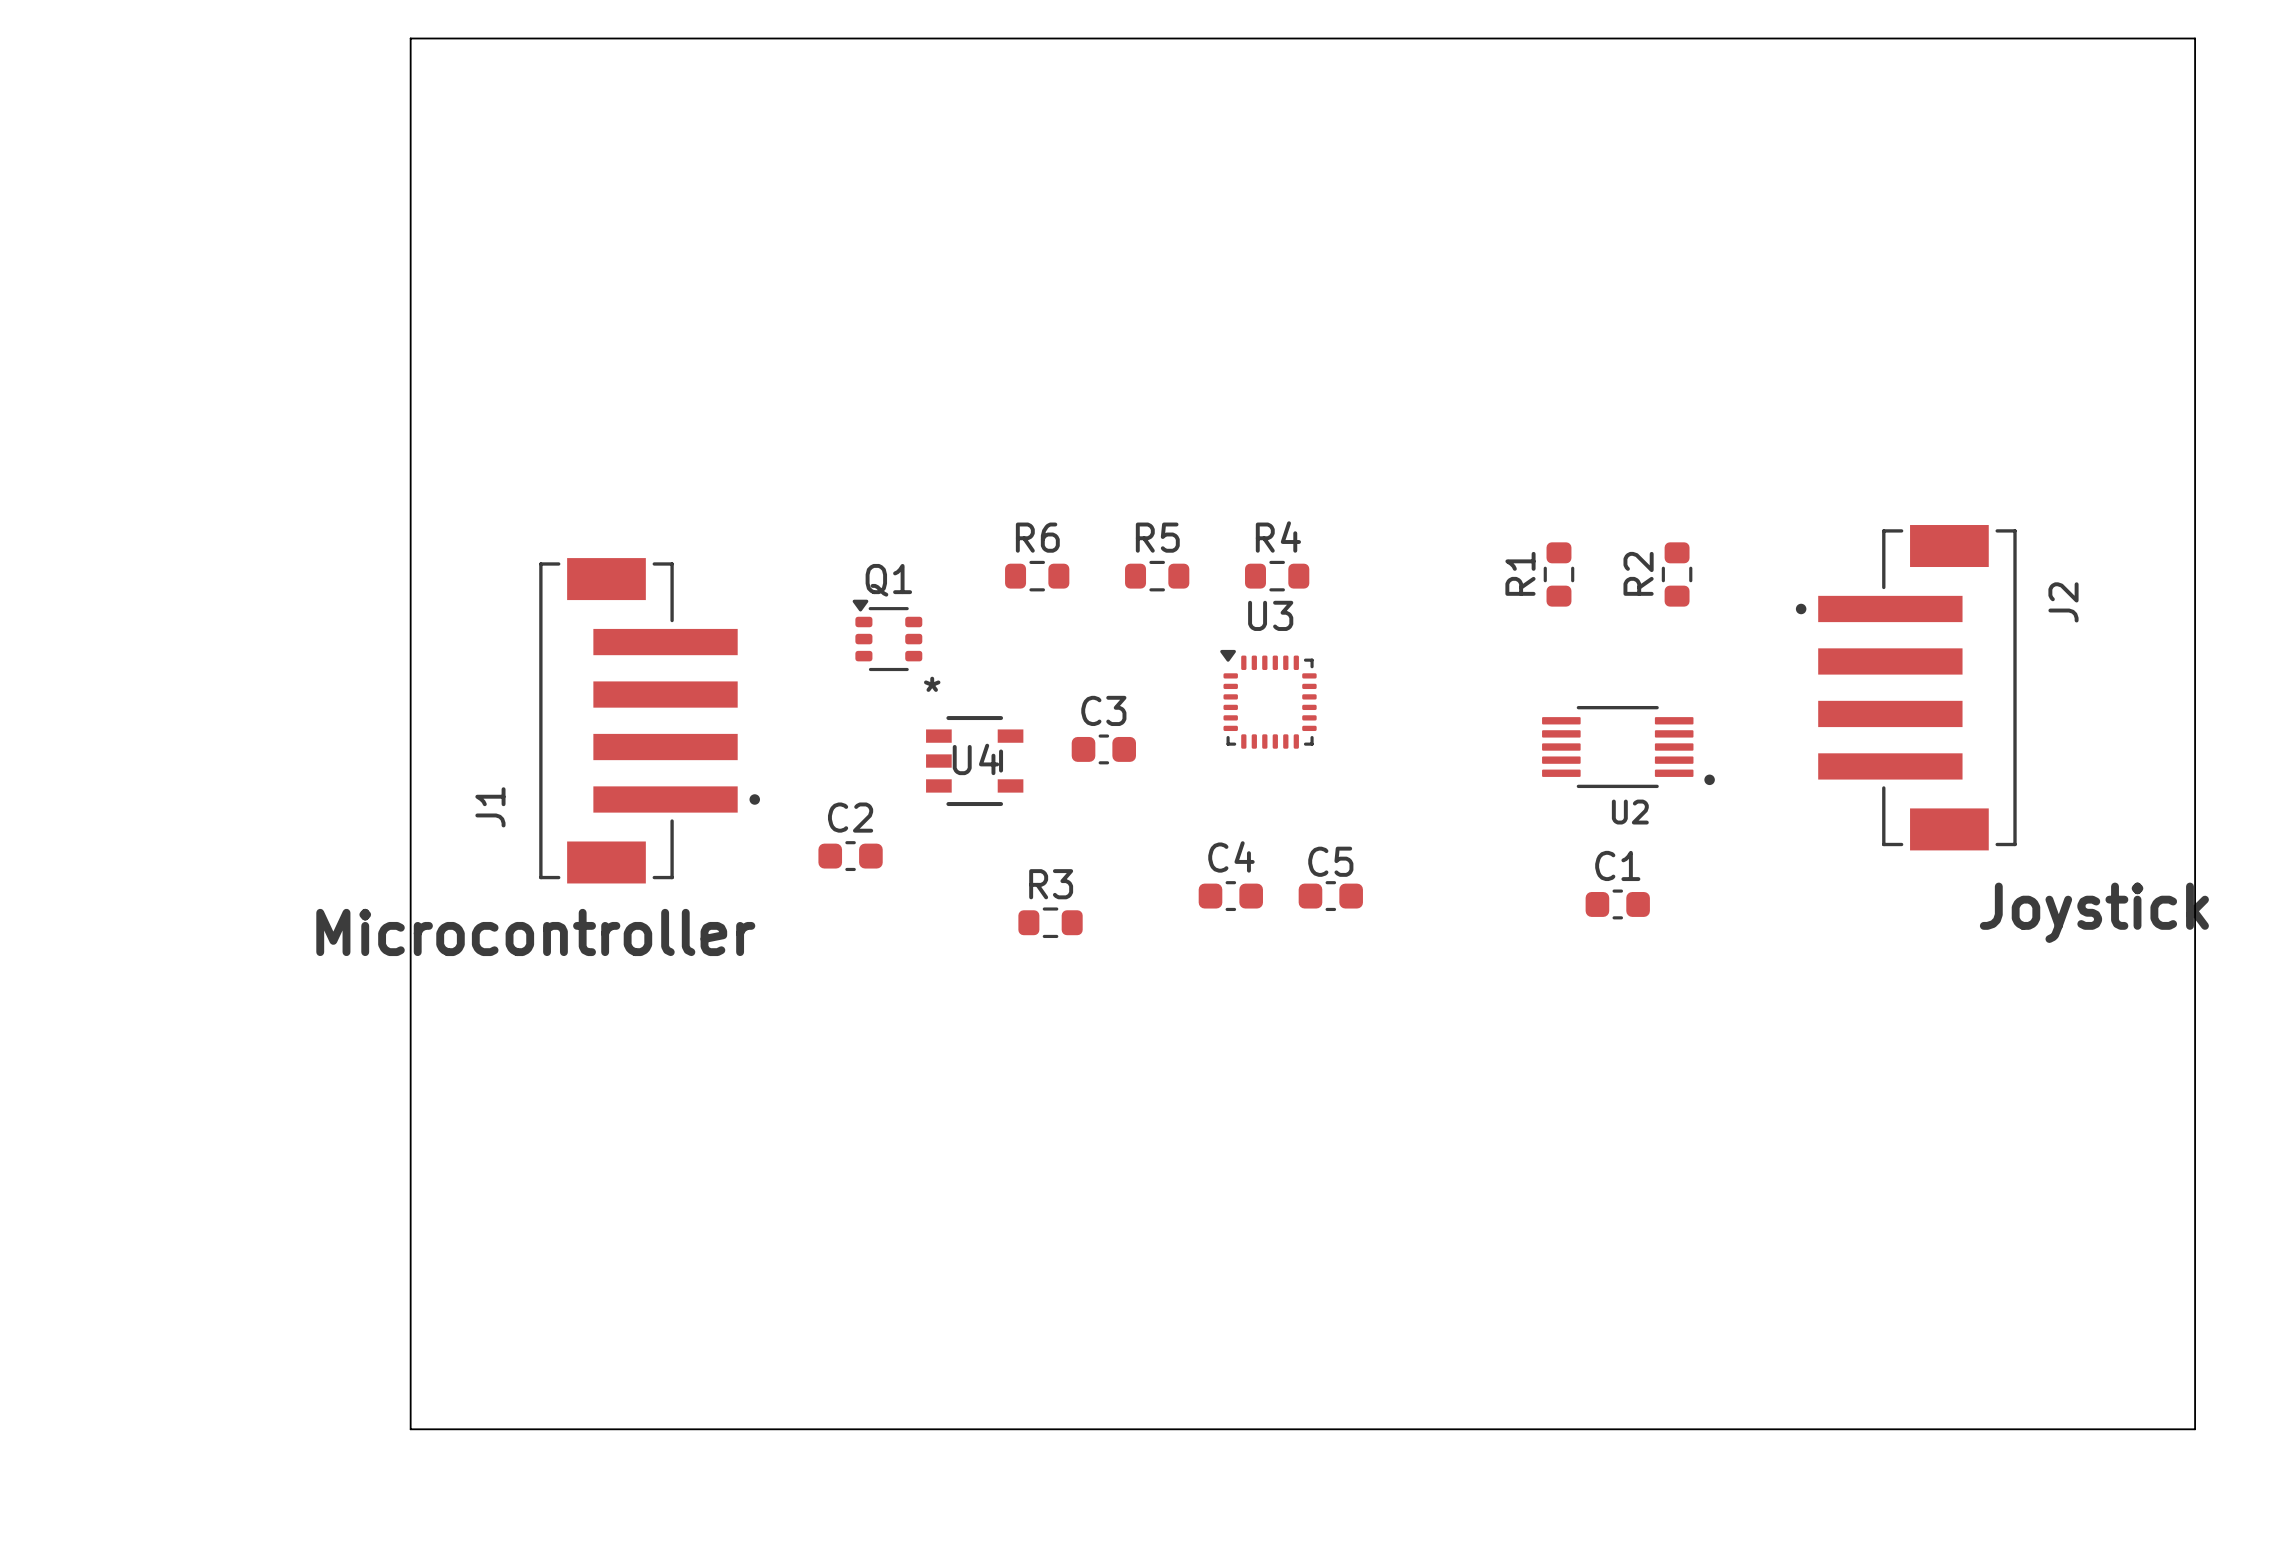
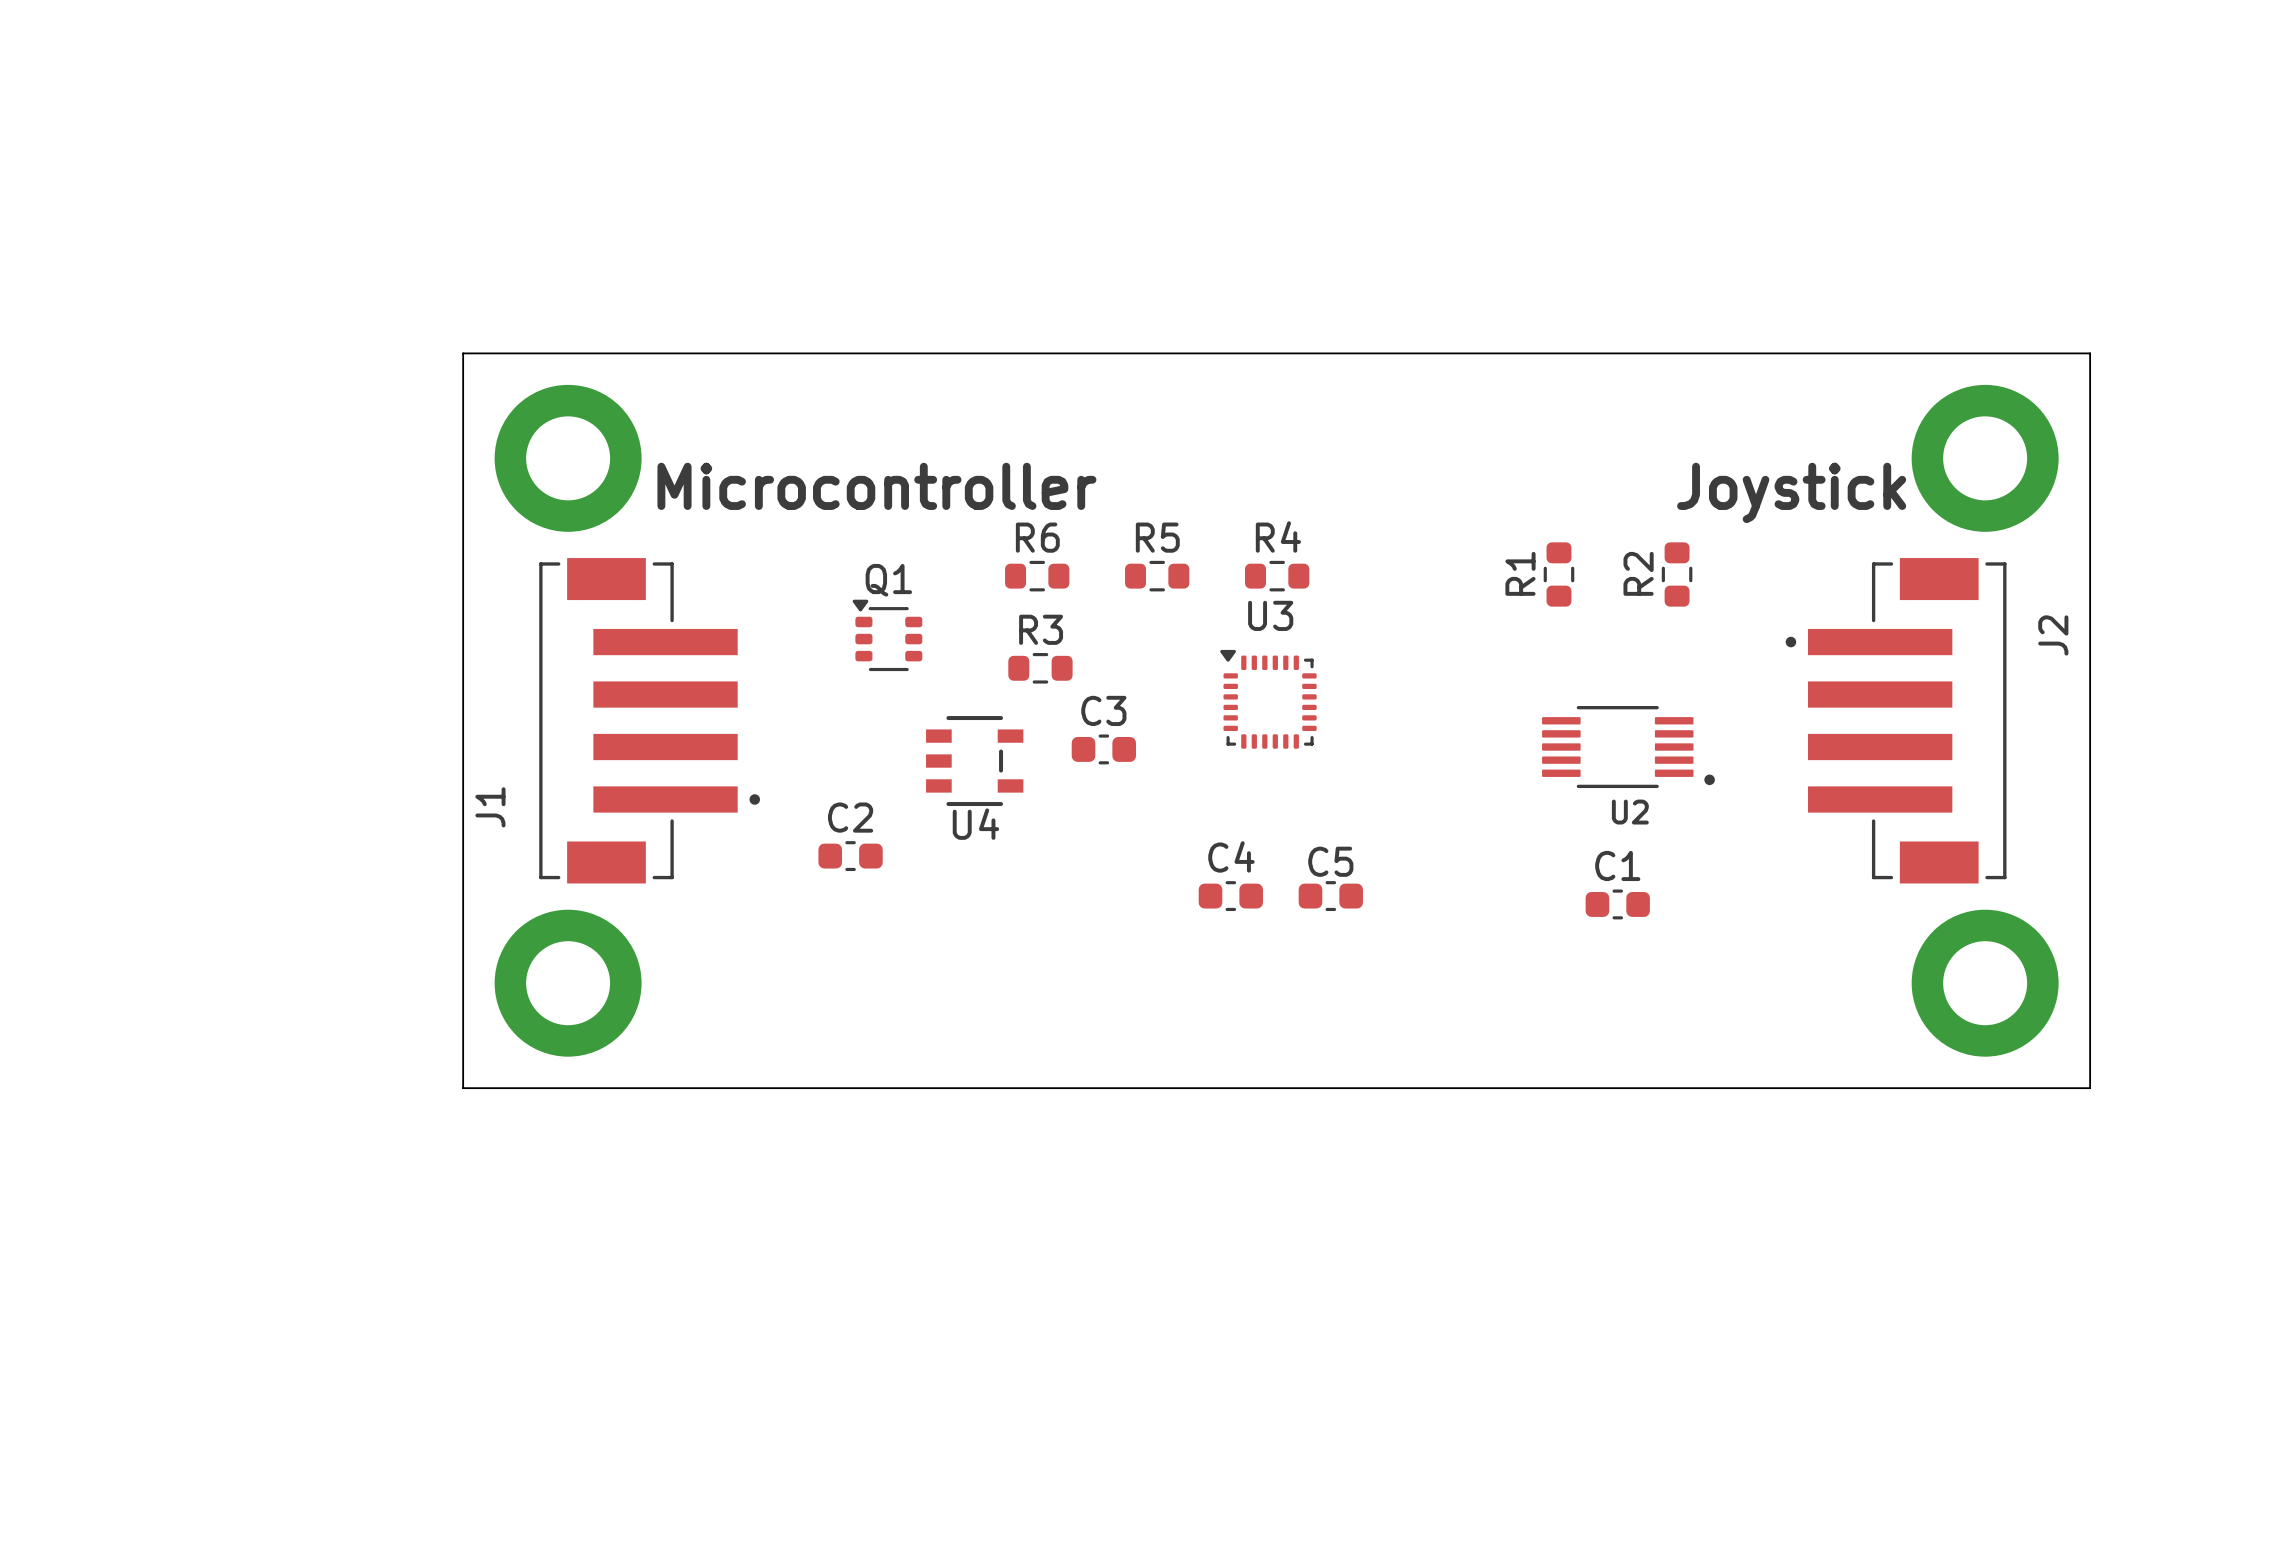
board edge: (410, 38) (2195, 38) (2195, 1429) (410, 1429) (410, 38) -> none
board edge: none -> (463, 353) (2090, 353) (2090, 1088) (463, 1088) (463, 353)
part: none -> (568, 458)
part: none -> (1985, 458)
U4 text: * (932, 684) -> none
J2 position: (1906, 687) -> (1896, 720)
U4 name position: U4 (975, 759) -> U4 (975, 824)
text position: Joystick (2094, 912) -> Joystick (1791, 492)
R3 position: (1050, 922) -> (1040, 668)
text position: Microcontroller (535, 932) -> Microcontroller (876, 486)
part: none -> (568, 983)
part: none -> (1985, 983)

